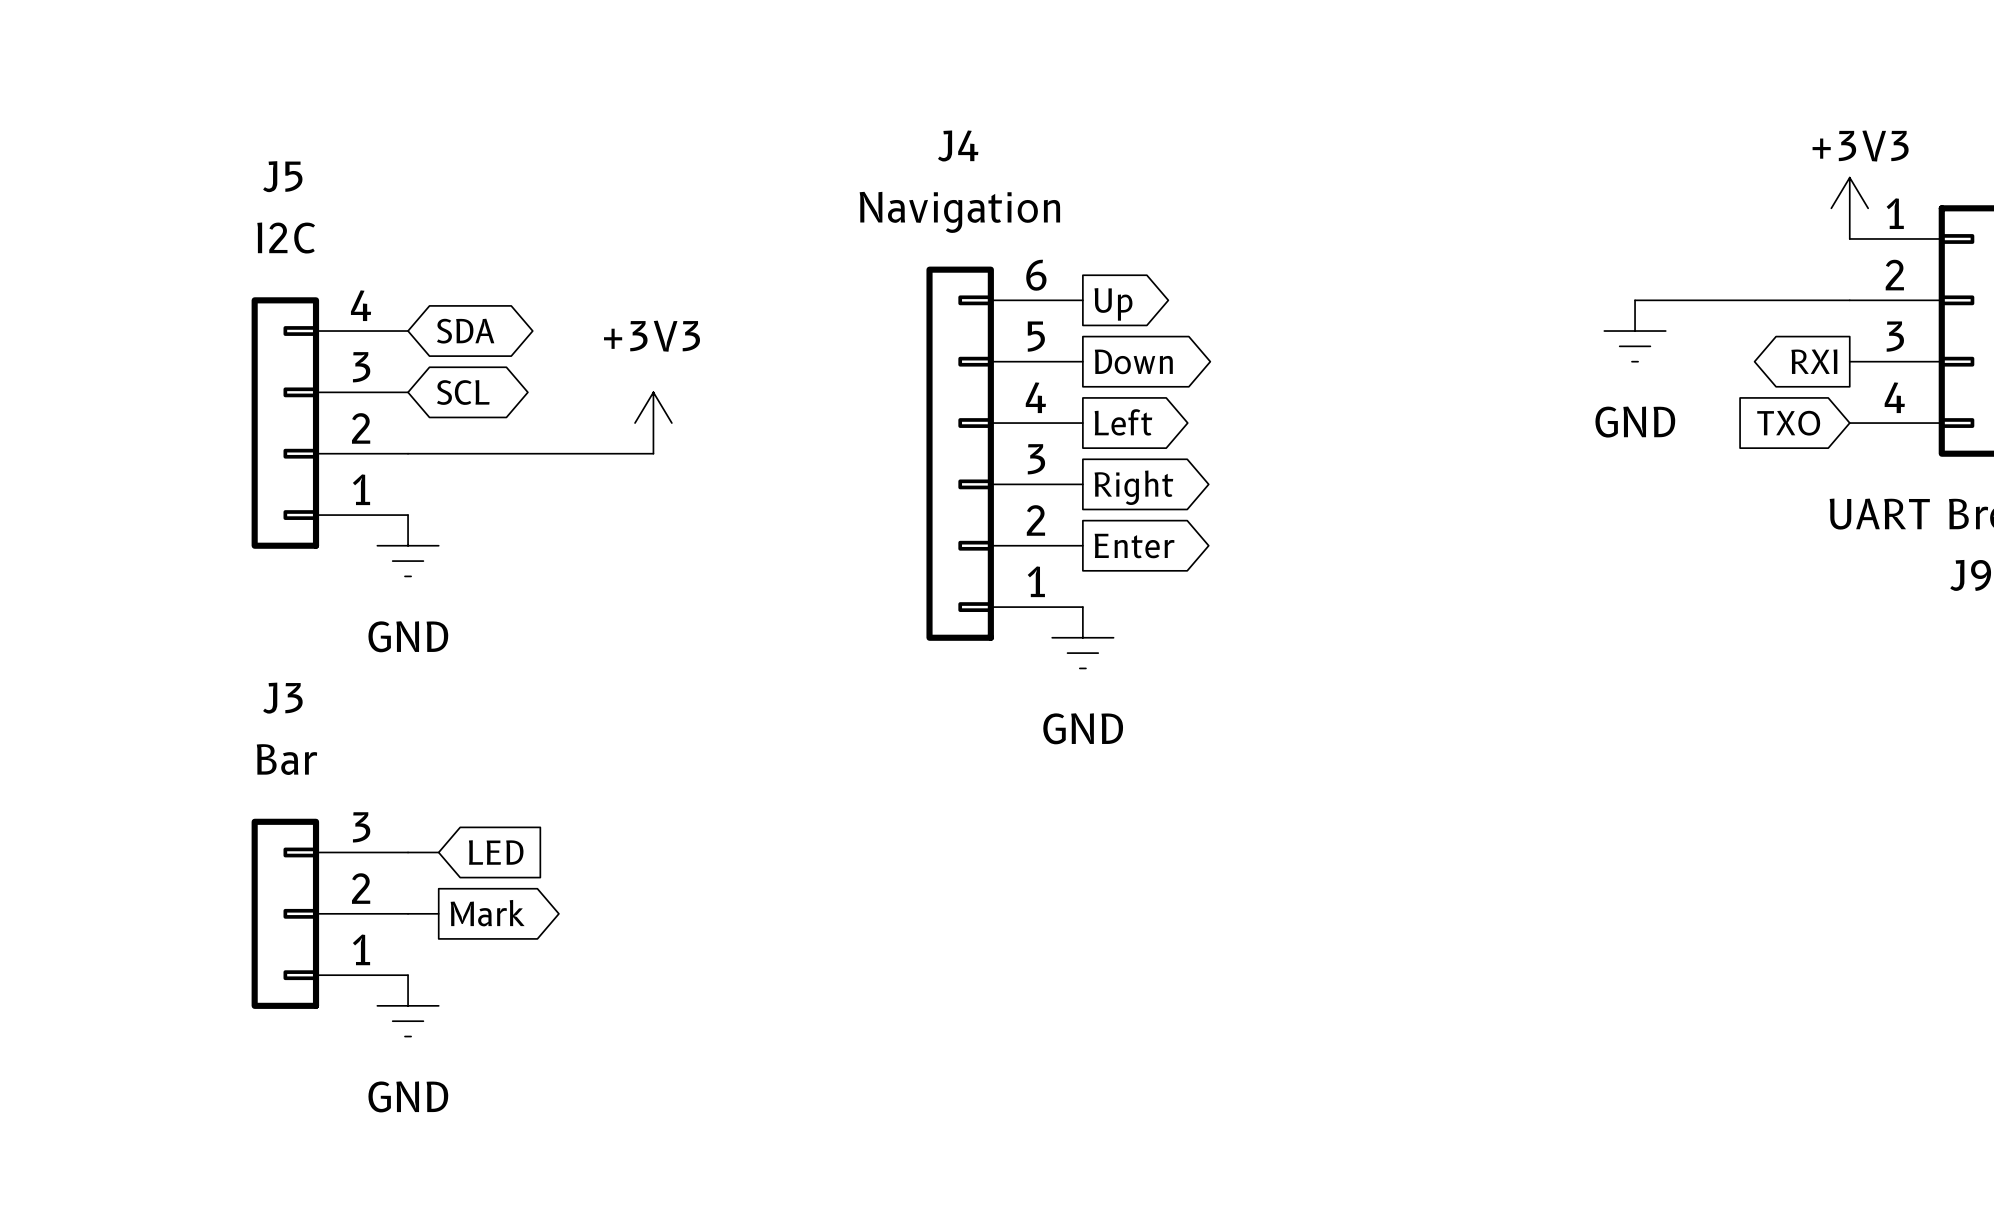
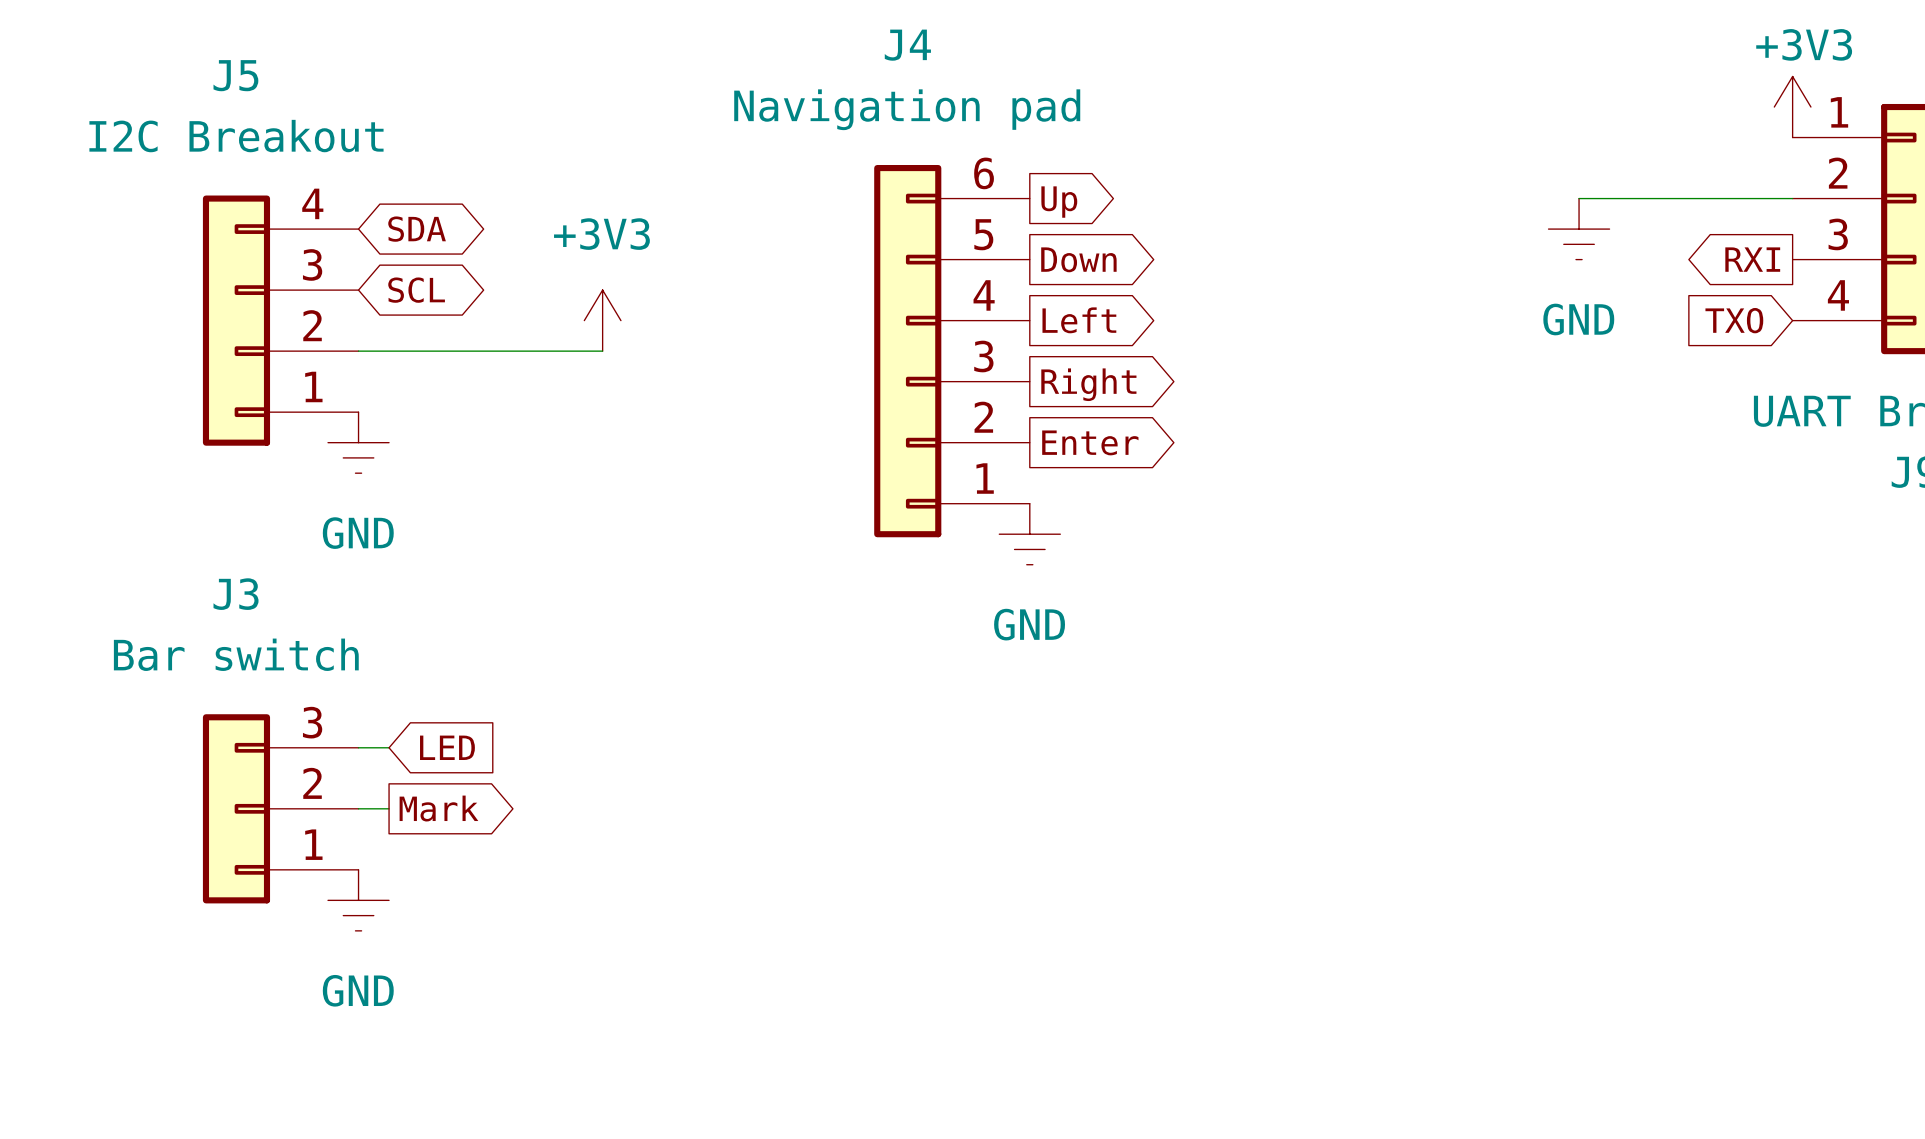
J4 value: Navigation (959, 212) -> Navigation pad (907, 109)
J5 value: I2C (286, 238) -> I2C Breakout (236, 136)
J3 value: Bar (286, 759) -> Bar switch (236, 654)

